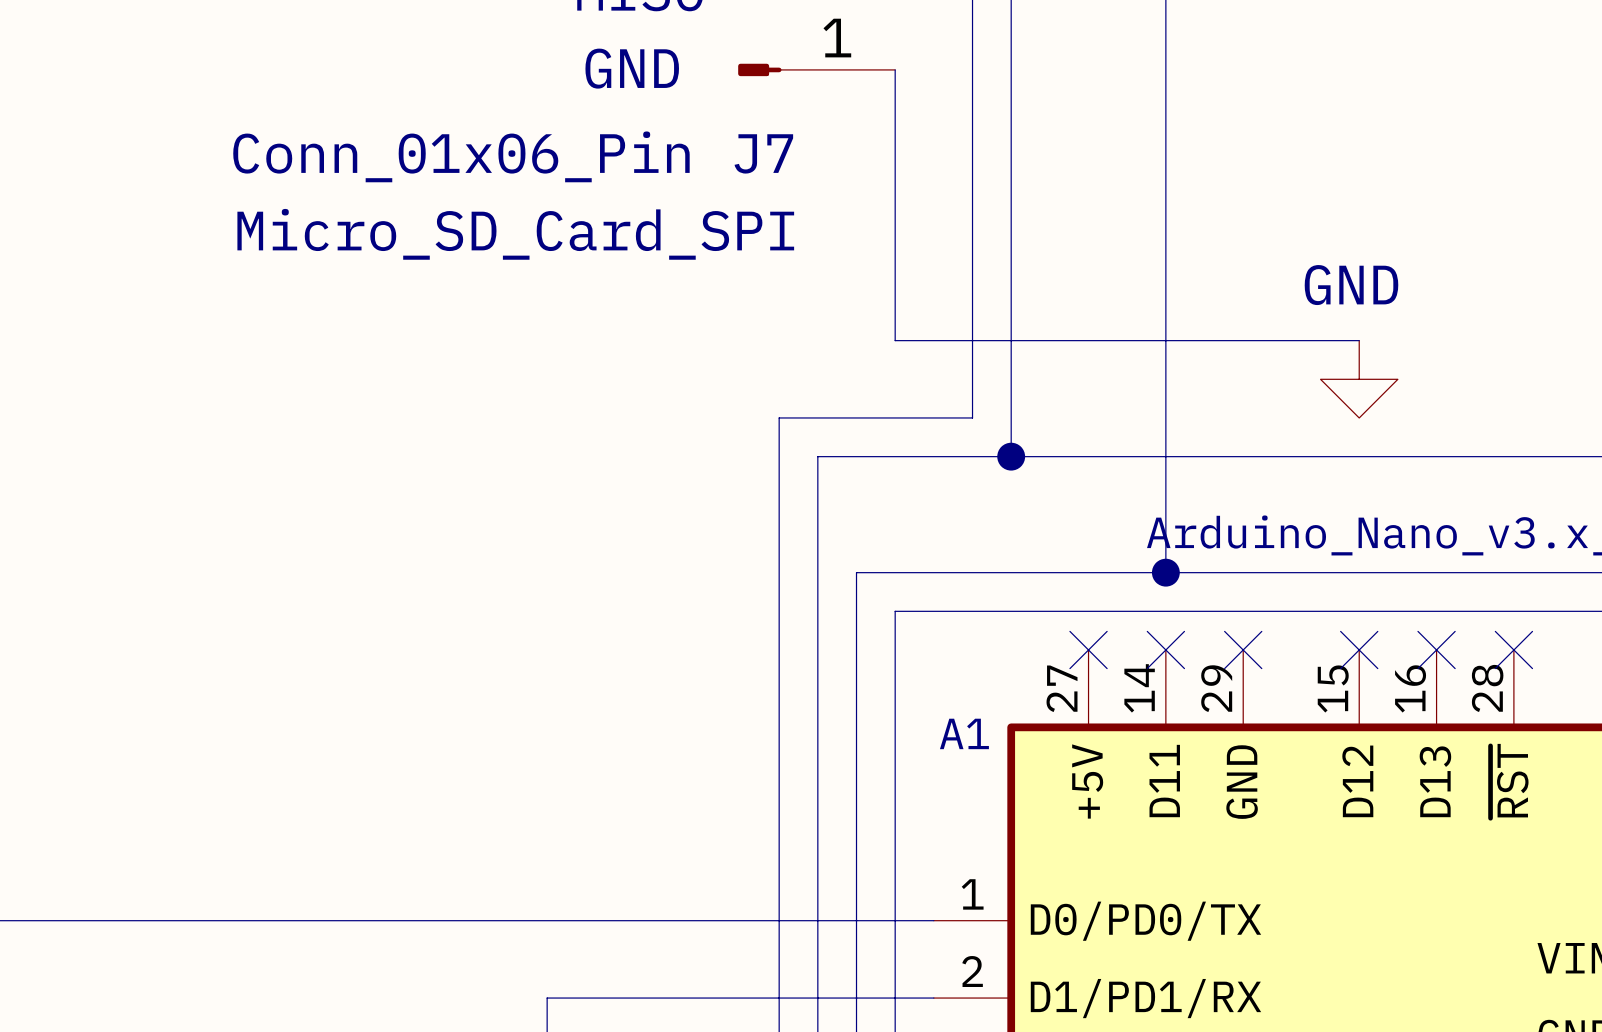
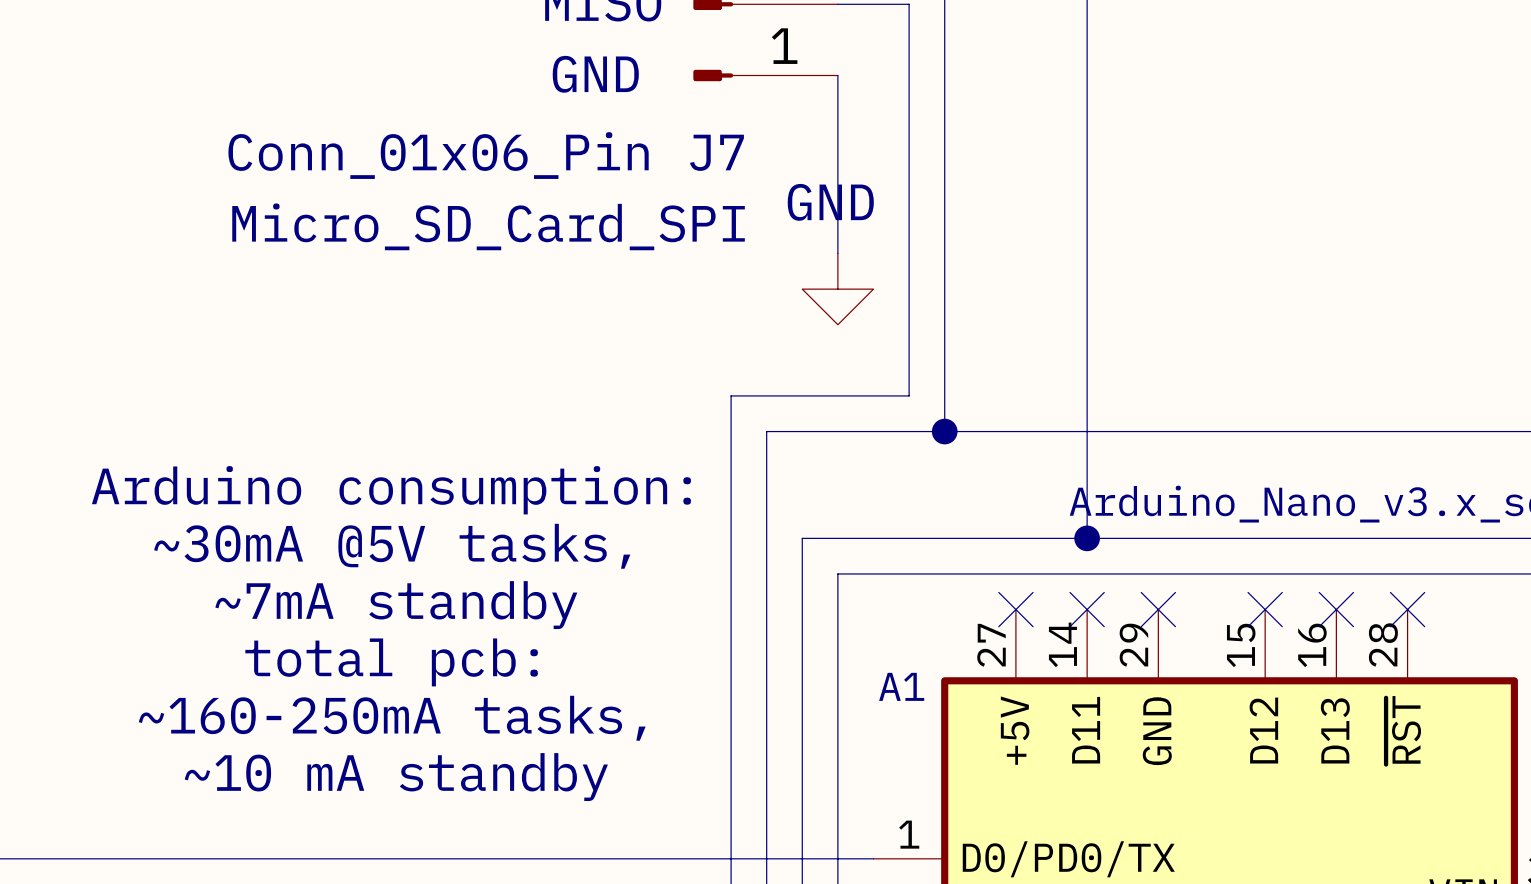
wire: (895, 263) (895, 340) (1359, 340) -> none
power symbol position: GND (1359, 379) -> GND (837, 289)
text: none -> Arduino consumption: (391, 490)
text: none -> ~30mA @5V tasks, (392, 546)
text: none -> ~7mA standby (396, 605)
text: none -> total pcb: (391, 662)
text: none -> ~160-250mA tasks, (392, 718)
text: none -> ~10 mA standby (396, 777)

